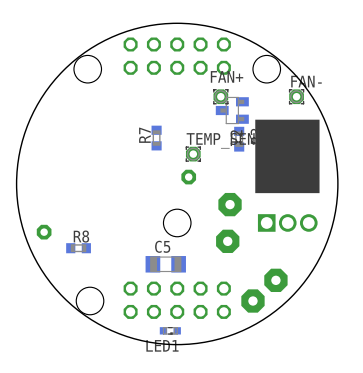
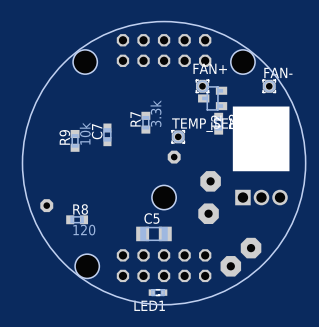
R7 value: none -> 3.3k (156, 113)
C7: none -> (107, 134)
R9: none -> 10k (75, 140)
R8 value: none -> 120 (84, 230)

